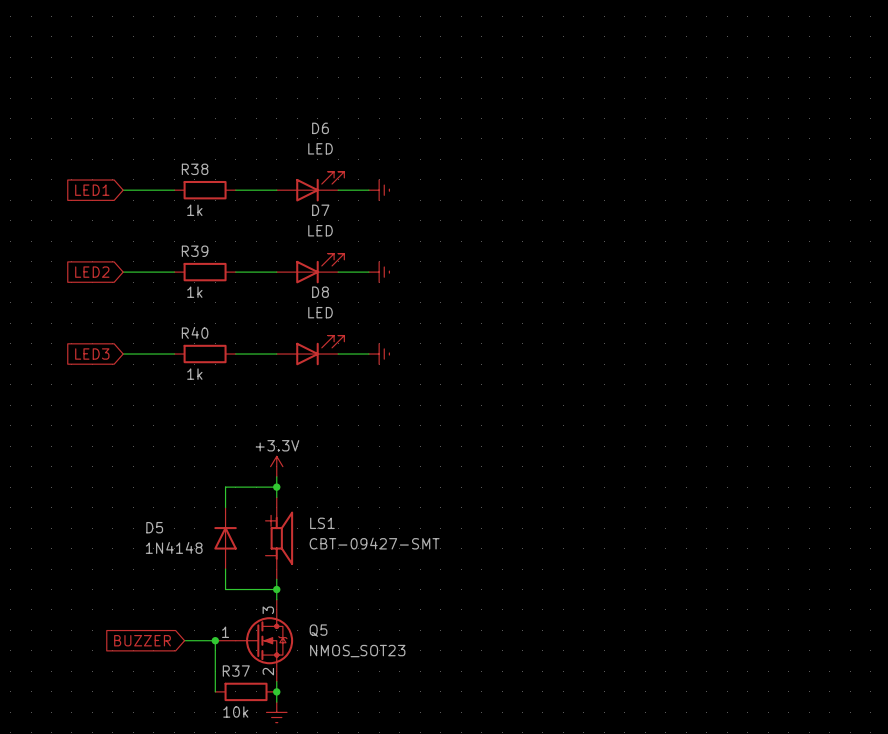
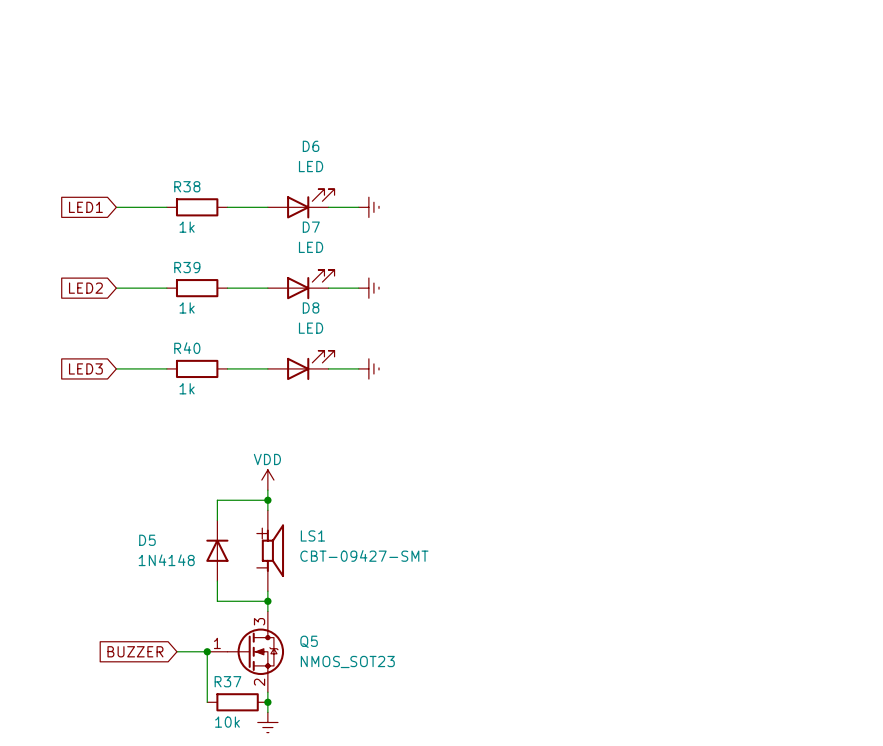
power symbol: +3.3V (276, 466) -> VDD (267, 480)

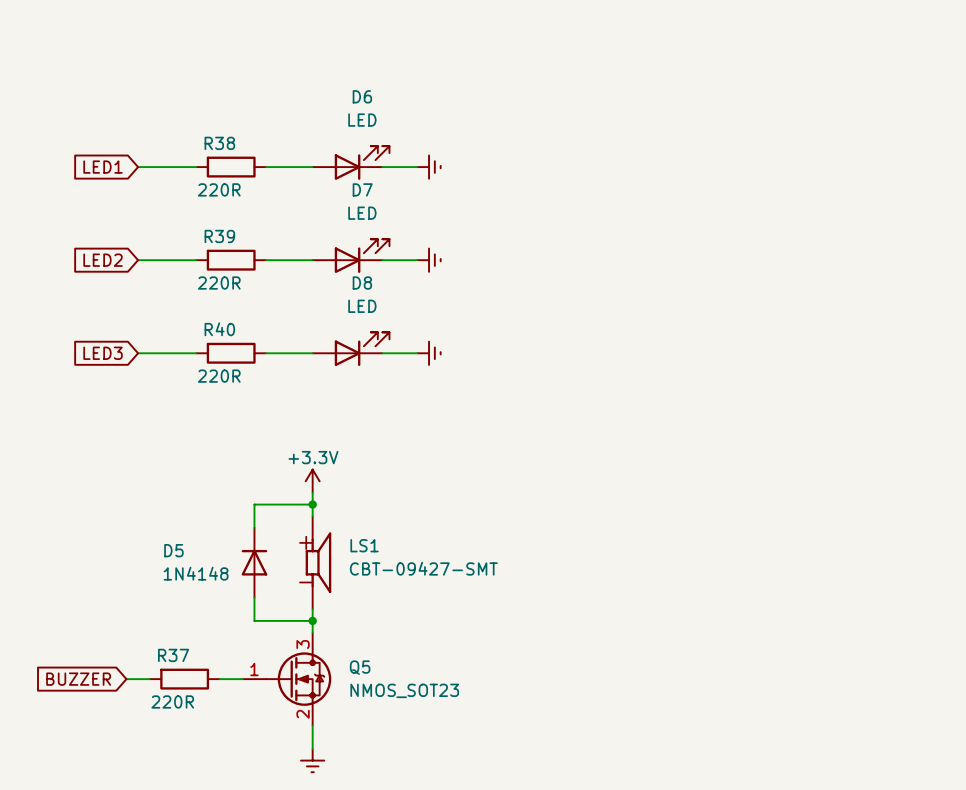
R38 value: 1k (187, 227) -> 220R (219, 189)
R39 value: 1k (187, 307) -> 220R (219, 283)
R40 value: 1k (187, 388) -> 220R (219, 376)
power symbol: VDD (267, 480) -> +3.3V (312, 481)
wire: none -> (126, 679) (149, 679)
global label position: BUZZER (135, 651) -> BUZZER (78, 679)
wire: (207, 651) (207, 702) -> none
junction: (207, 651) -> none
R37 position: (237, 702) -> (184, 679)
junction: (267, 702) -> none
R37 value: 10k (227, 722) -> 220R (172, 701)

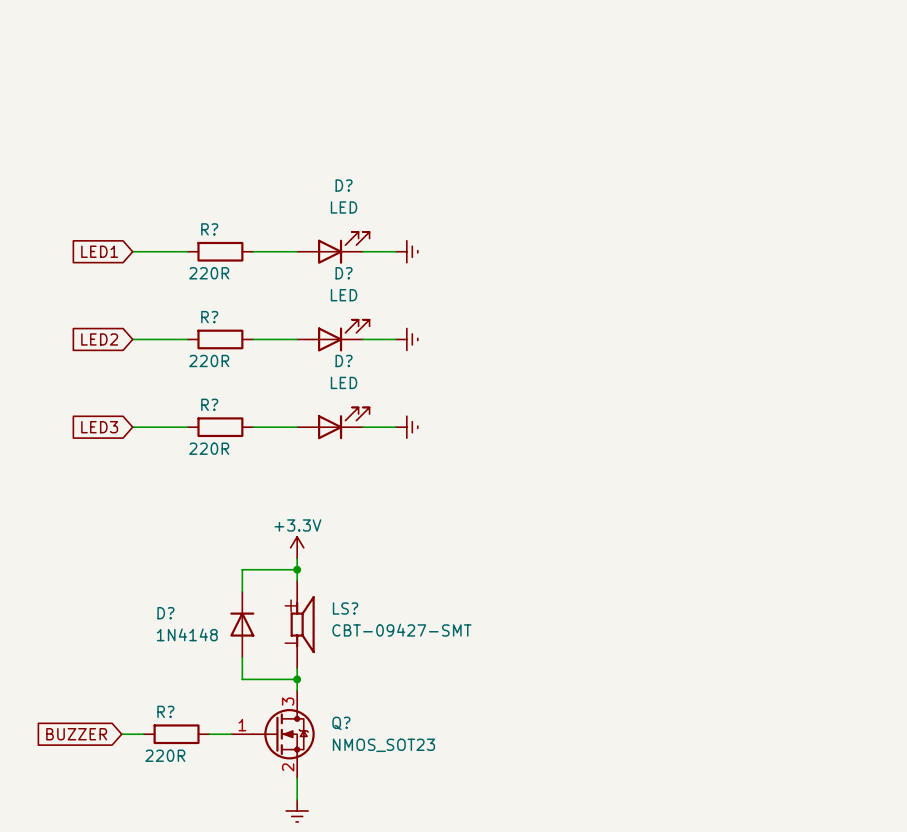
D6 name: D6 (362, 96) -> D? (344, 185)
R38 name: R38 (219, 143) -> R? (209, 229)
D7 name: D7 (362, 189) -> D? (344, 273)
R39 name: R39 (219, 236) -> R? (209, 317)
D8 name: D8 (362, 283) -> D? (344, 360)
R40 name: R40 (219, 329) -> R? (209, 404)
LS1 name: LS1 (364, 545) -> LS? (345, 608)
D5 name: D5 (173, 550) -> D? (165, 613)
R37 name: R37 (173, 655) -> R? (165, 711)
Q5 name: Q5 (360, 667) -> Q? (341, 723)

